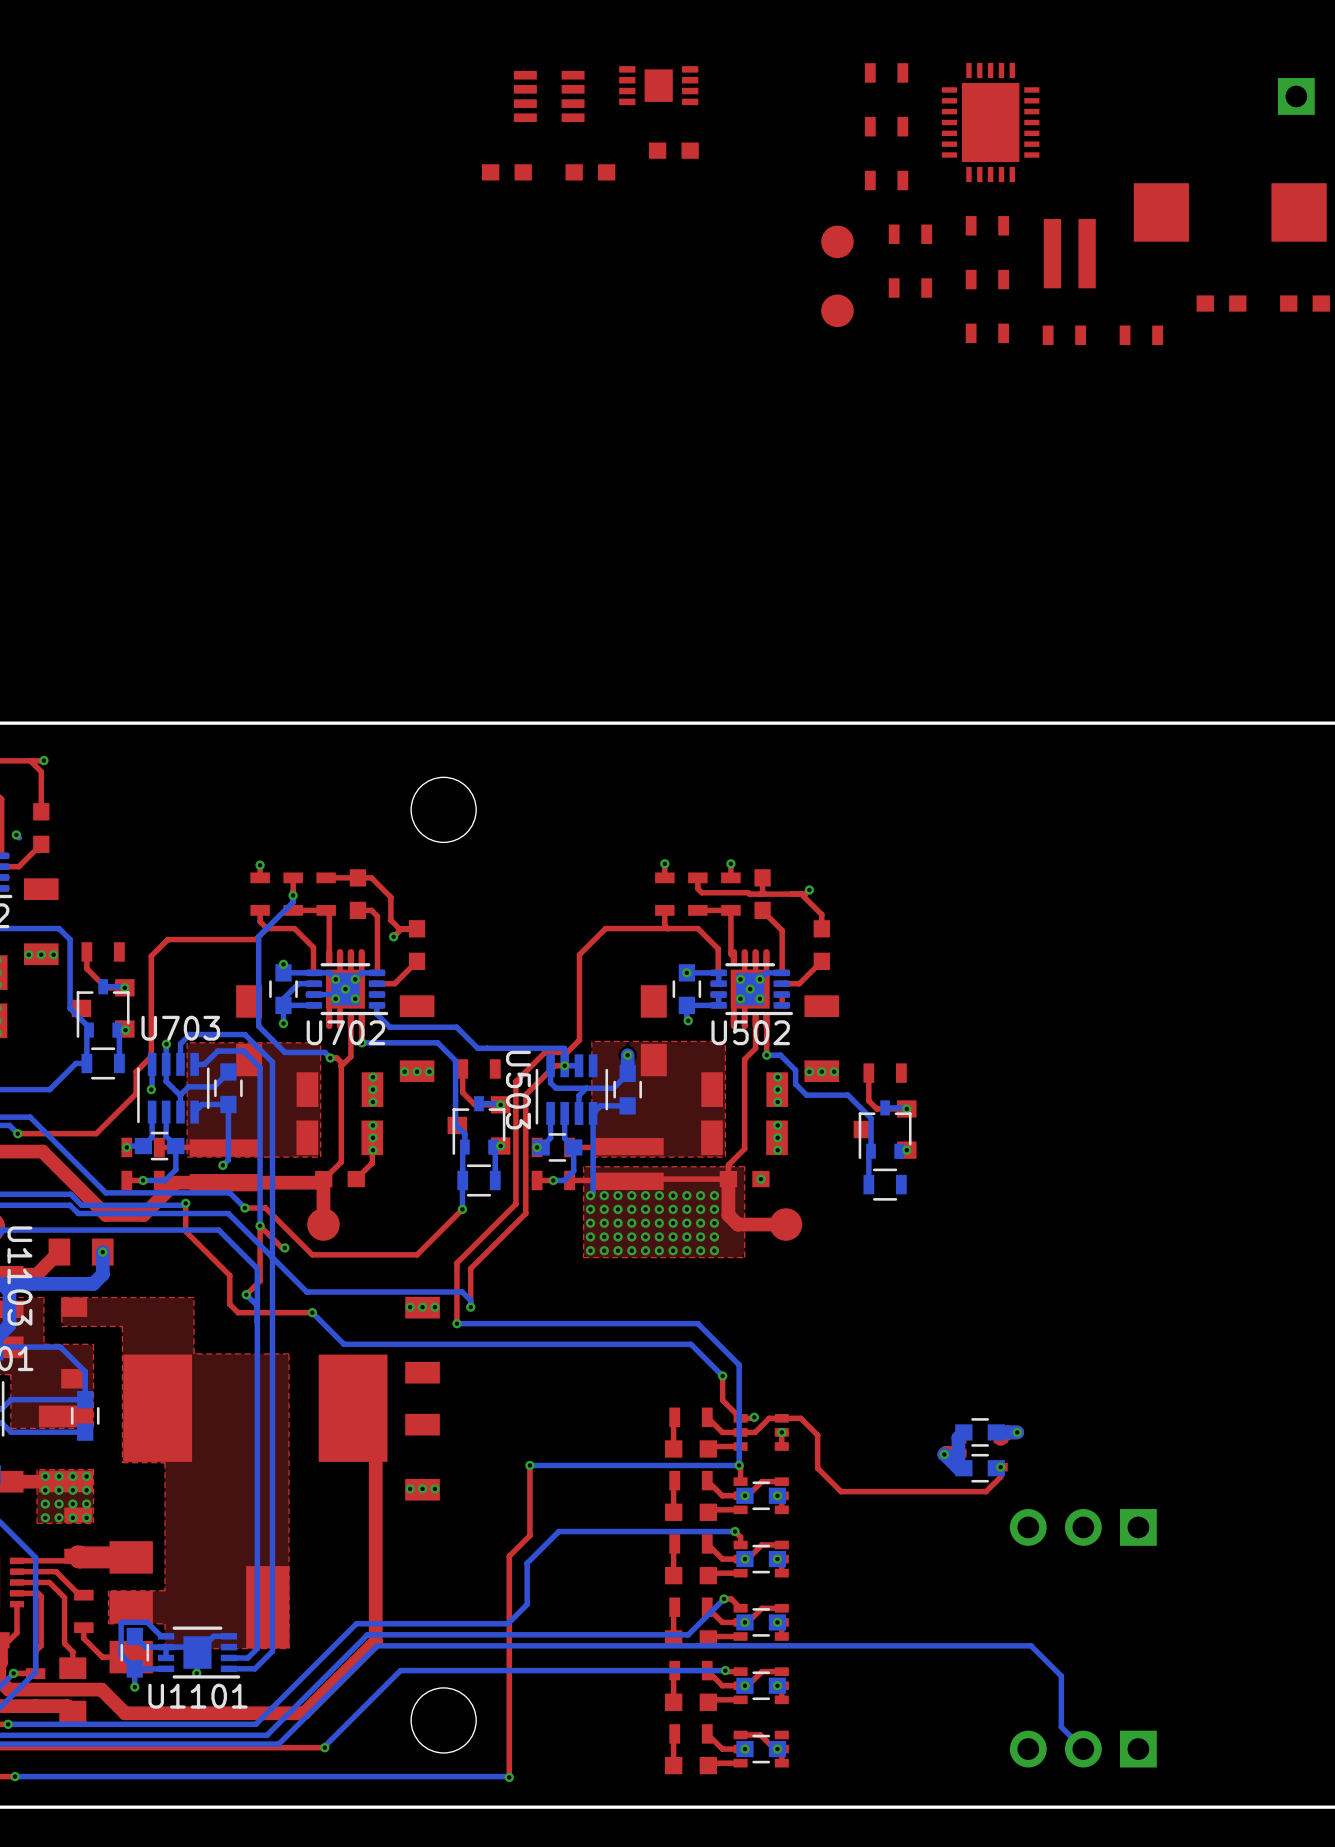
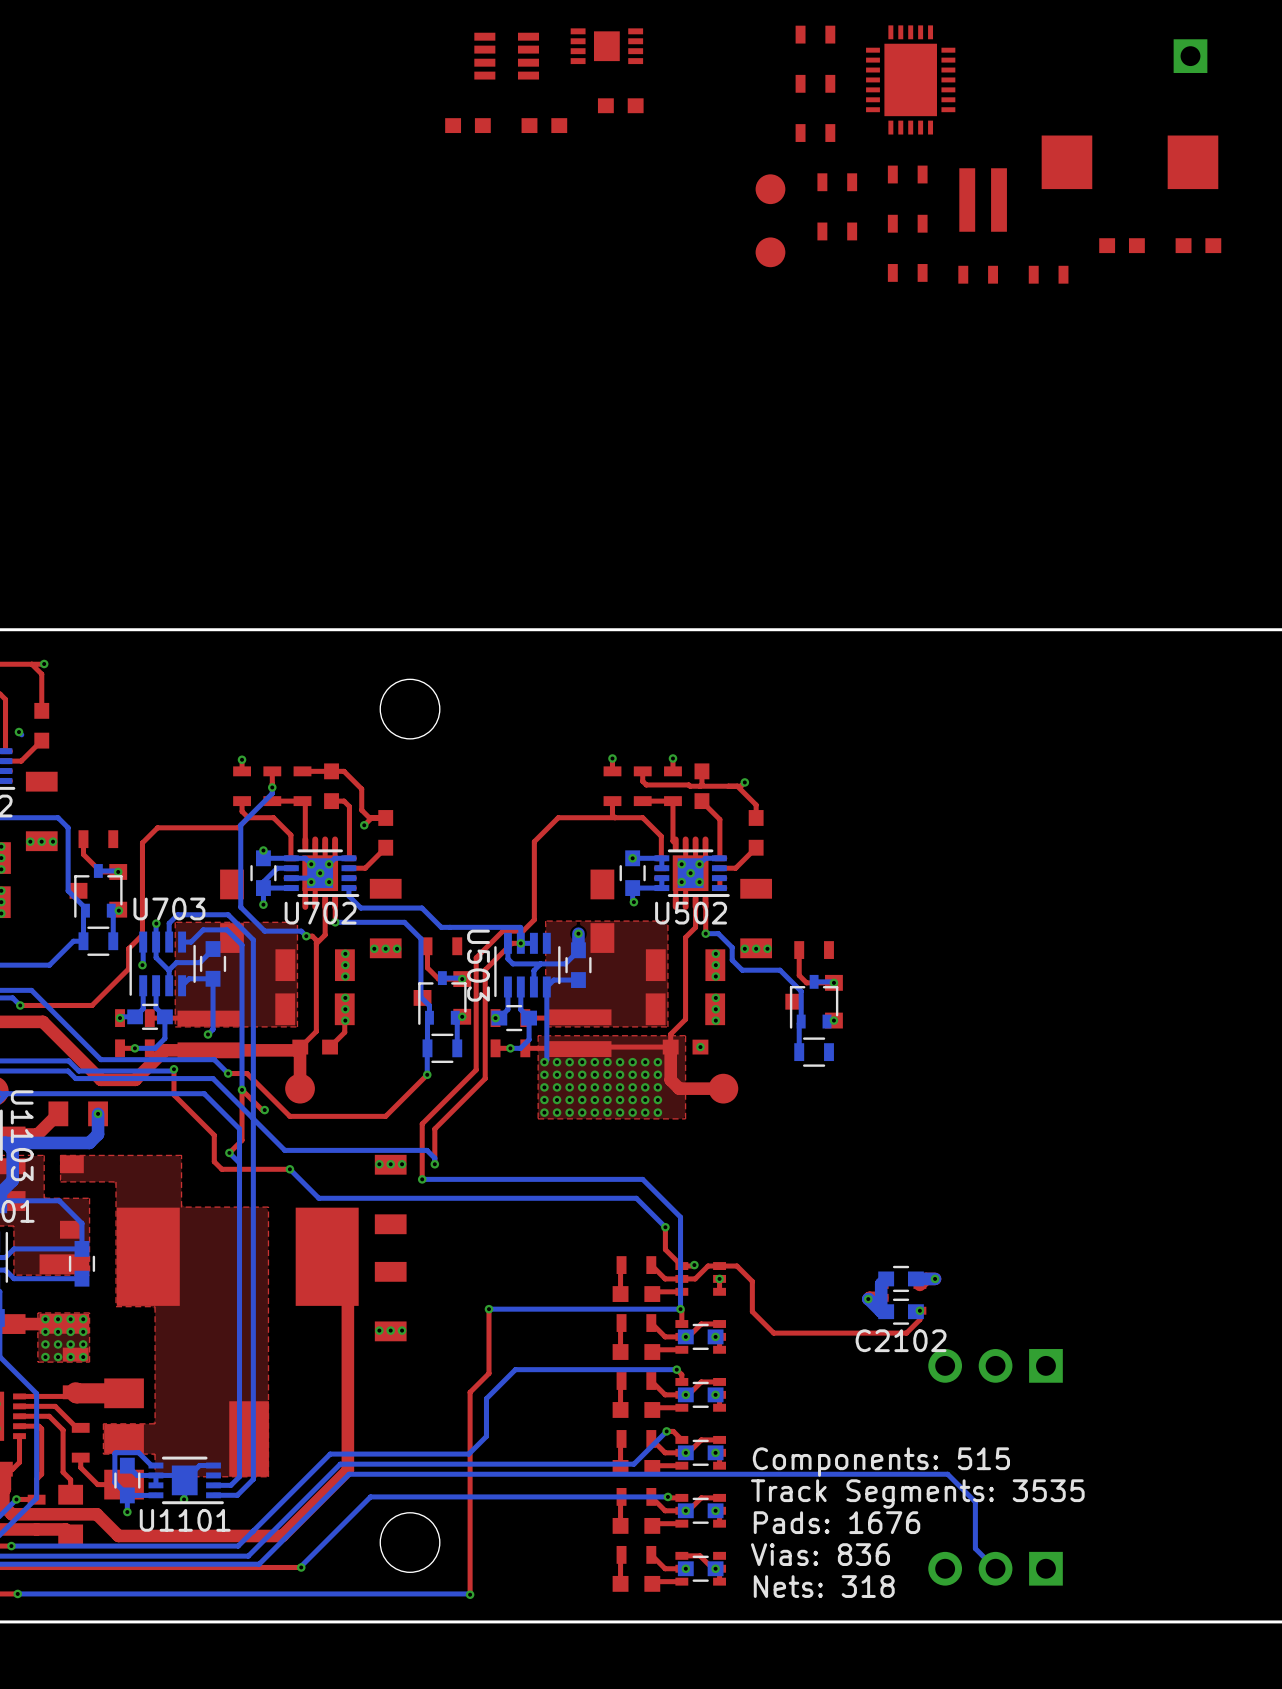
C2102 name: none -> C2102 (901, 1340)
text: none -> Components: 515 (881, 1462)
text: none -> Track Segments: 3535 (917, 1494)
text: none -> Pads: 1676 (837, 1522)
text: none -> Vias: 836 (820, 1554)
text: none -> Nets: 318 (824, 1586)

